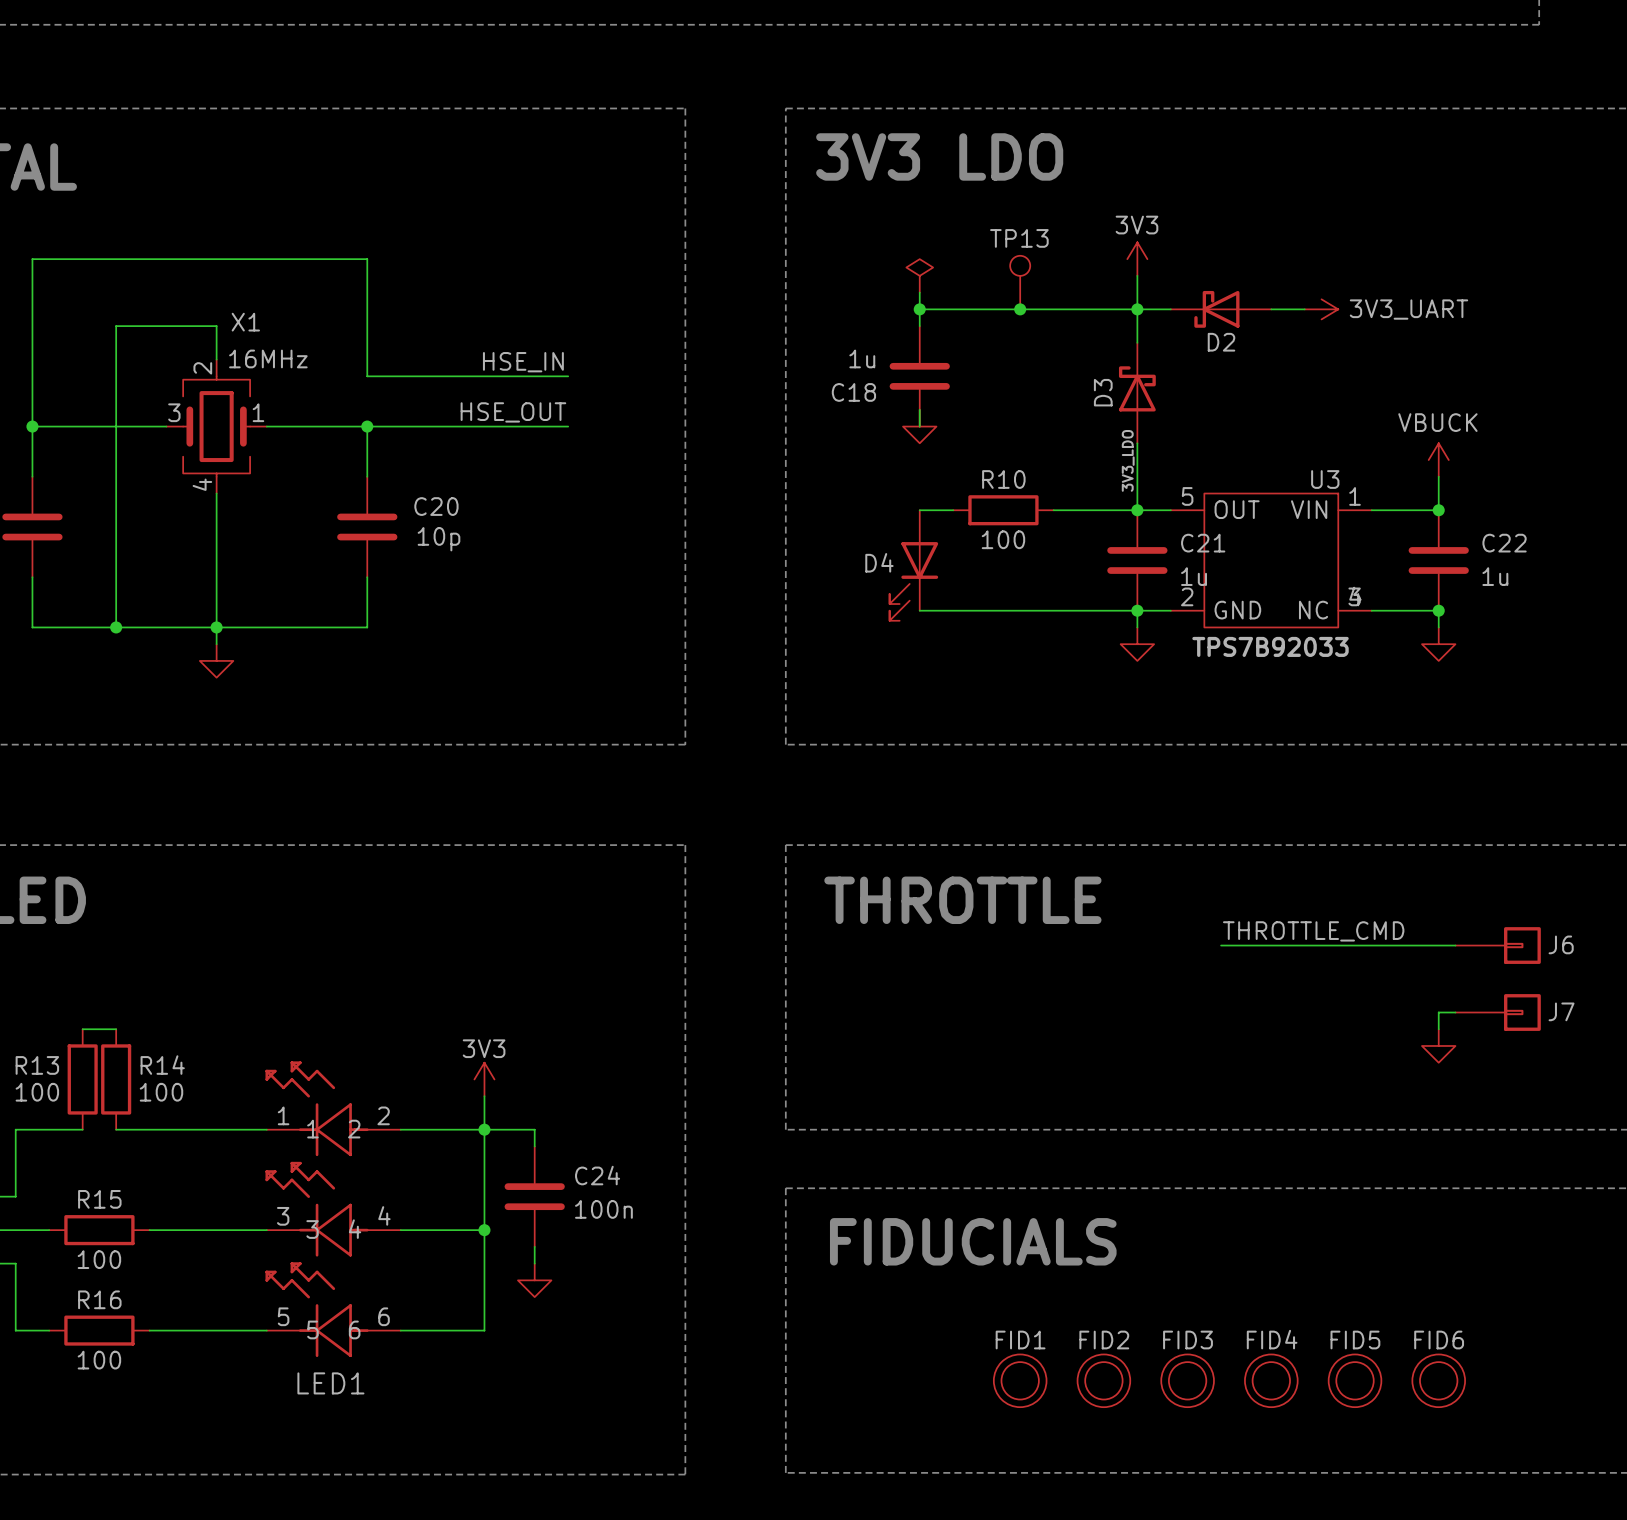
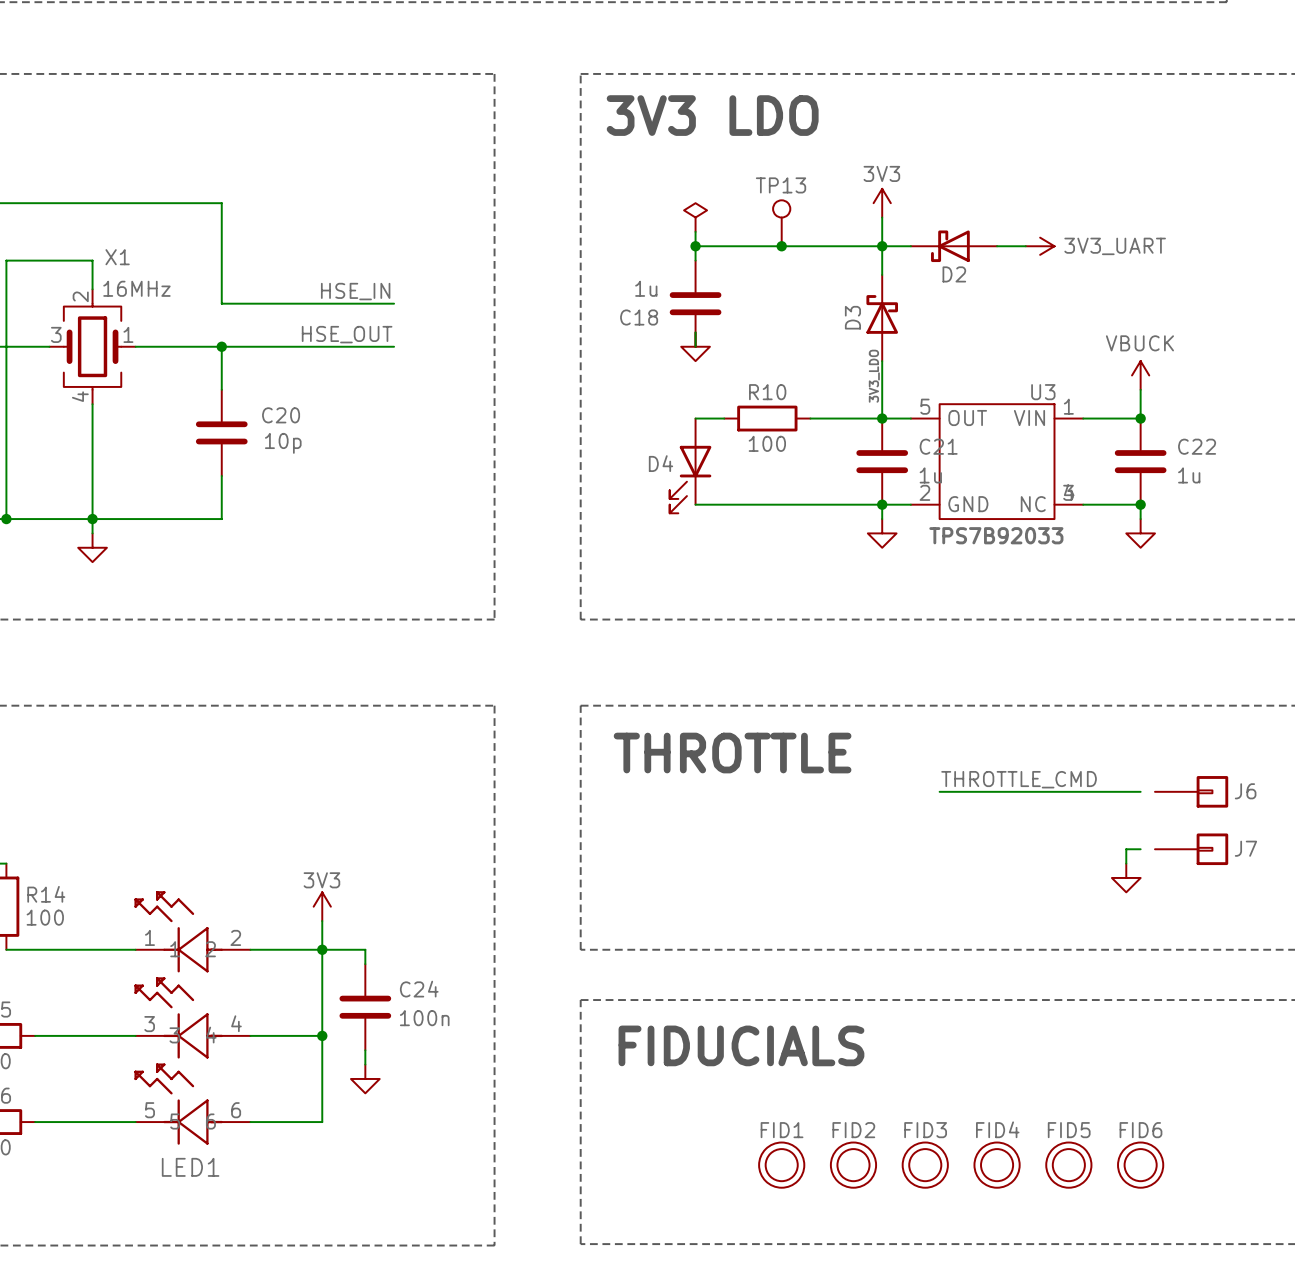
label position: THROTTLE_CMD (1313, 931) -> THROTTLE_CMD (1019, 779)
wire: (1438, 945) (1455, 945) -> (939, 791) (953, 791)
wire: (1455, 1012) (1438, 1012) (1438, 1029) -> (1140, 849) (1126, 849) (1126, 863)
power symbol position: (1438, 1045) -> (1126, 877)

